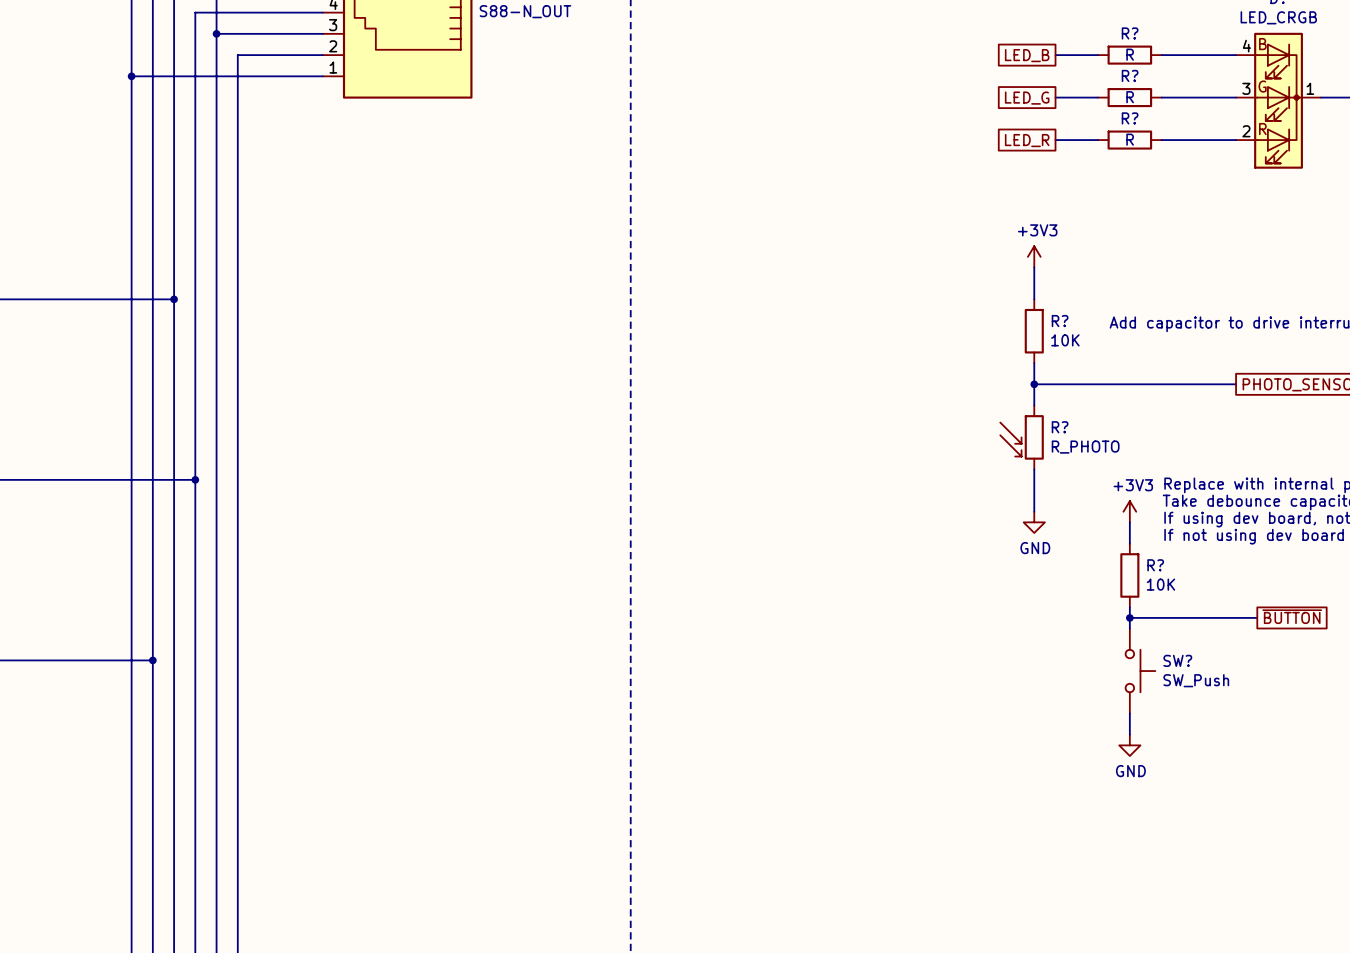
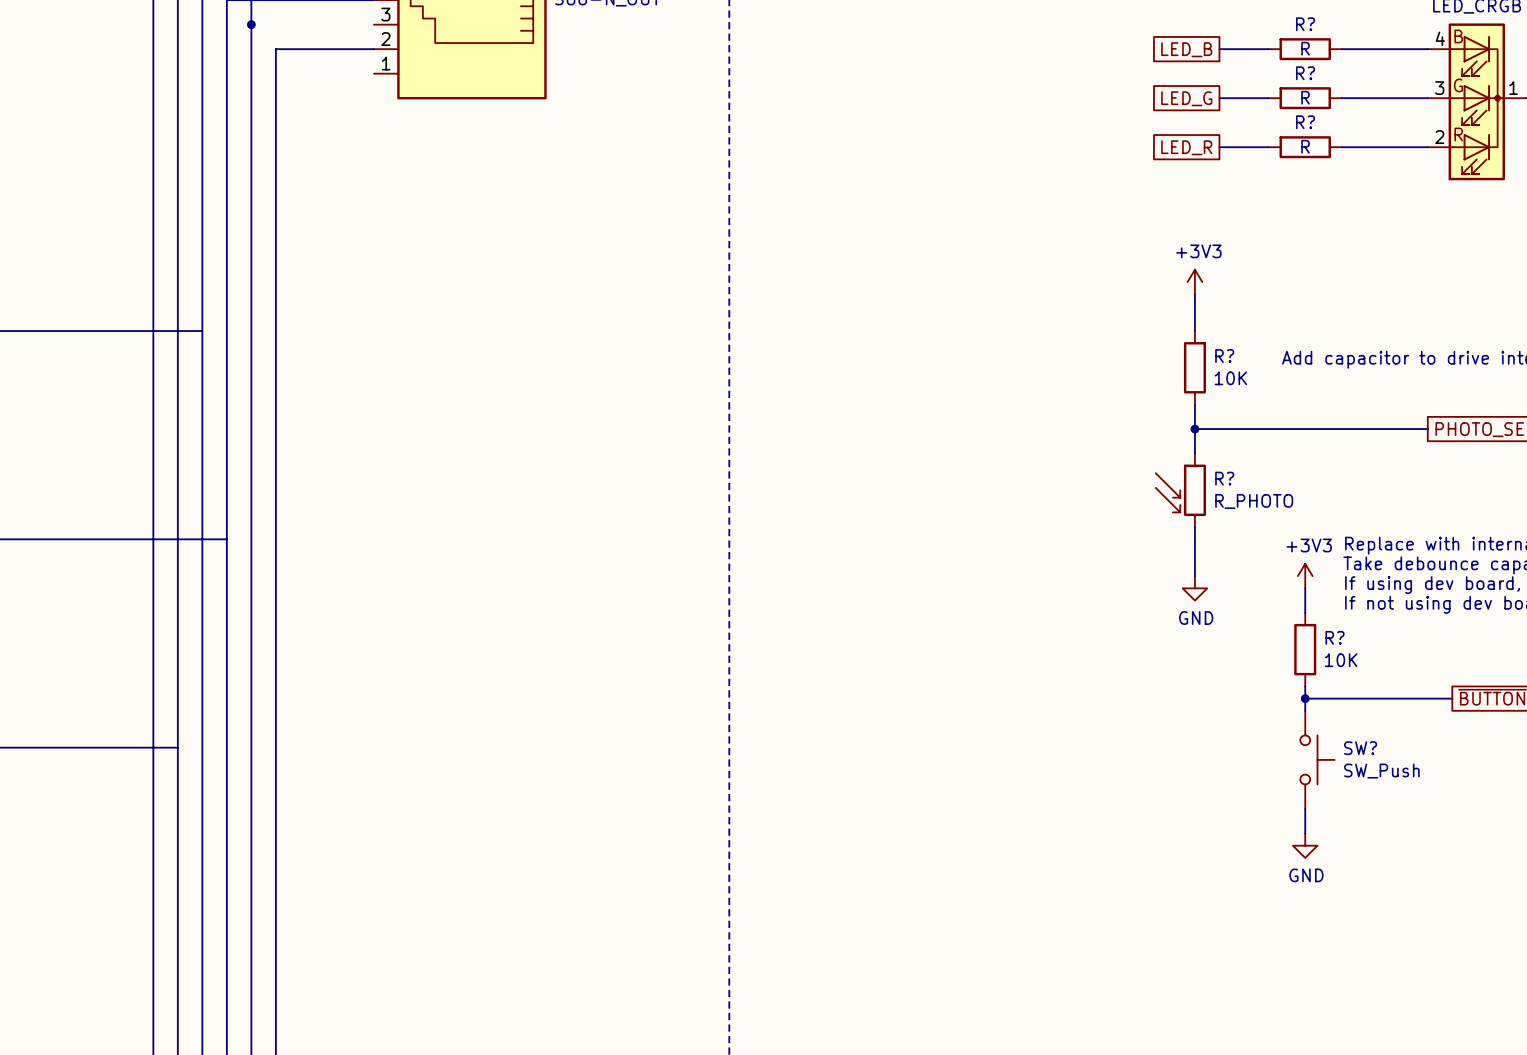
wire: (216, 33) (322, 33) -> none
wire: (131, 76) (322, 76) -> none
junction: (131, 76) -> none
junction: (174, 299) -> none
junction: (195, 479) -> none
junction: (152, 660) -> none

